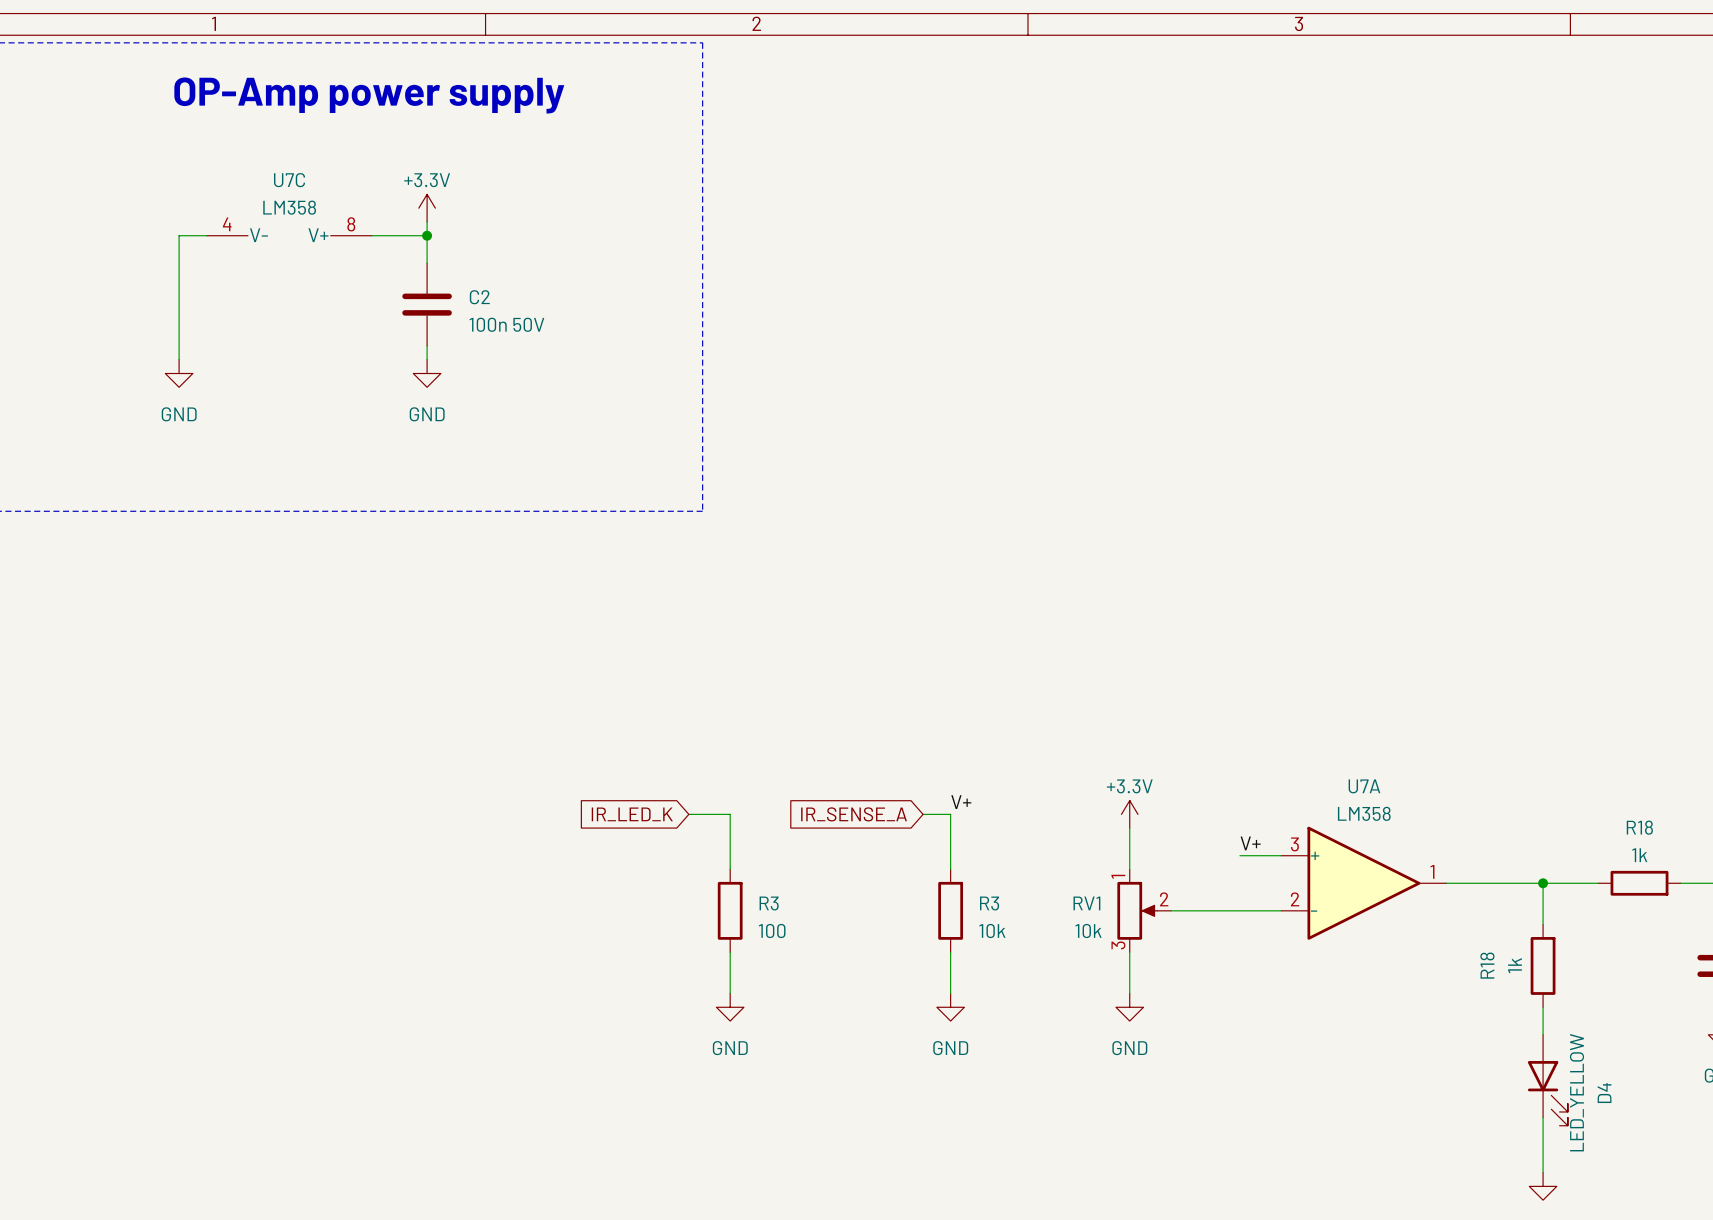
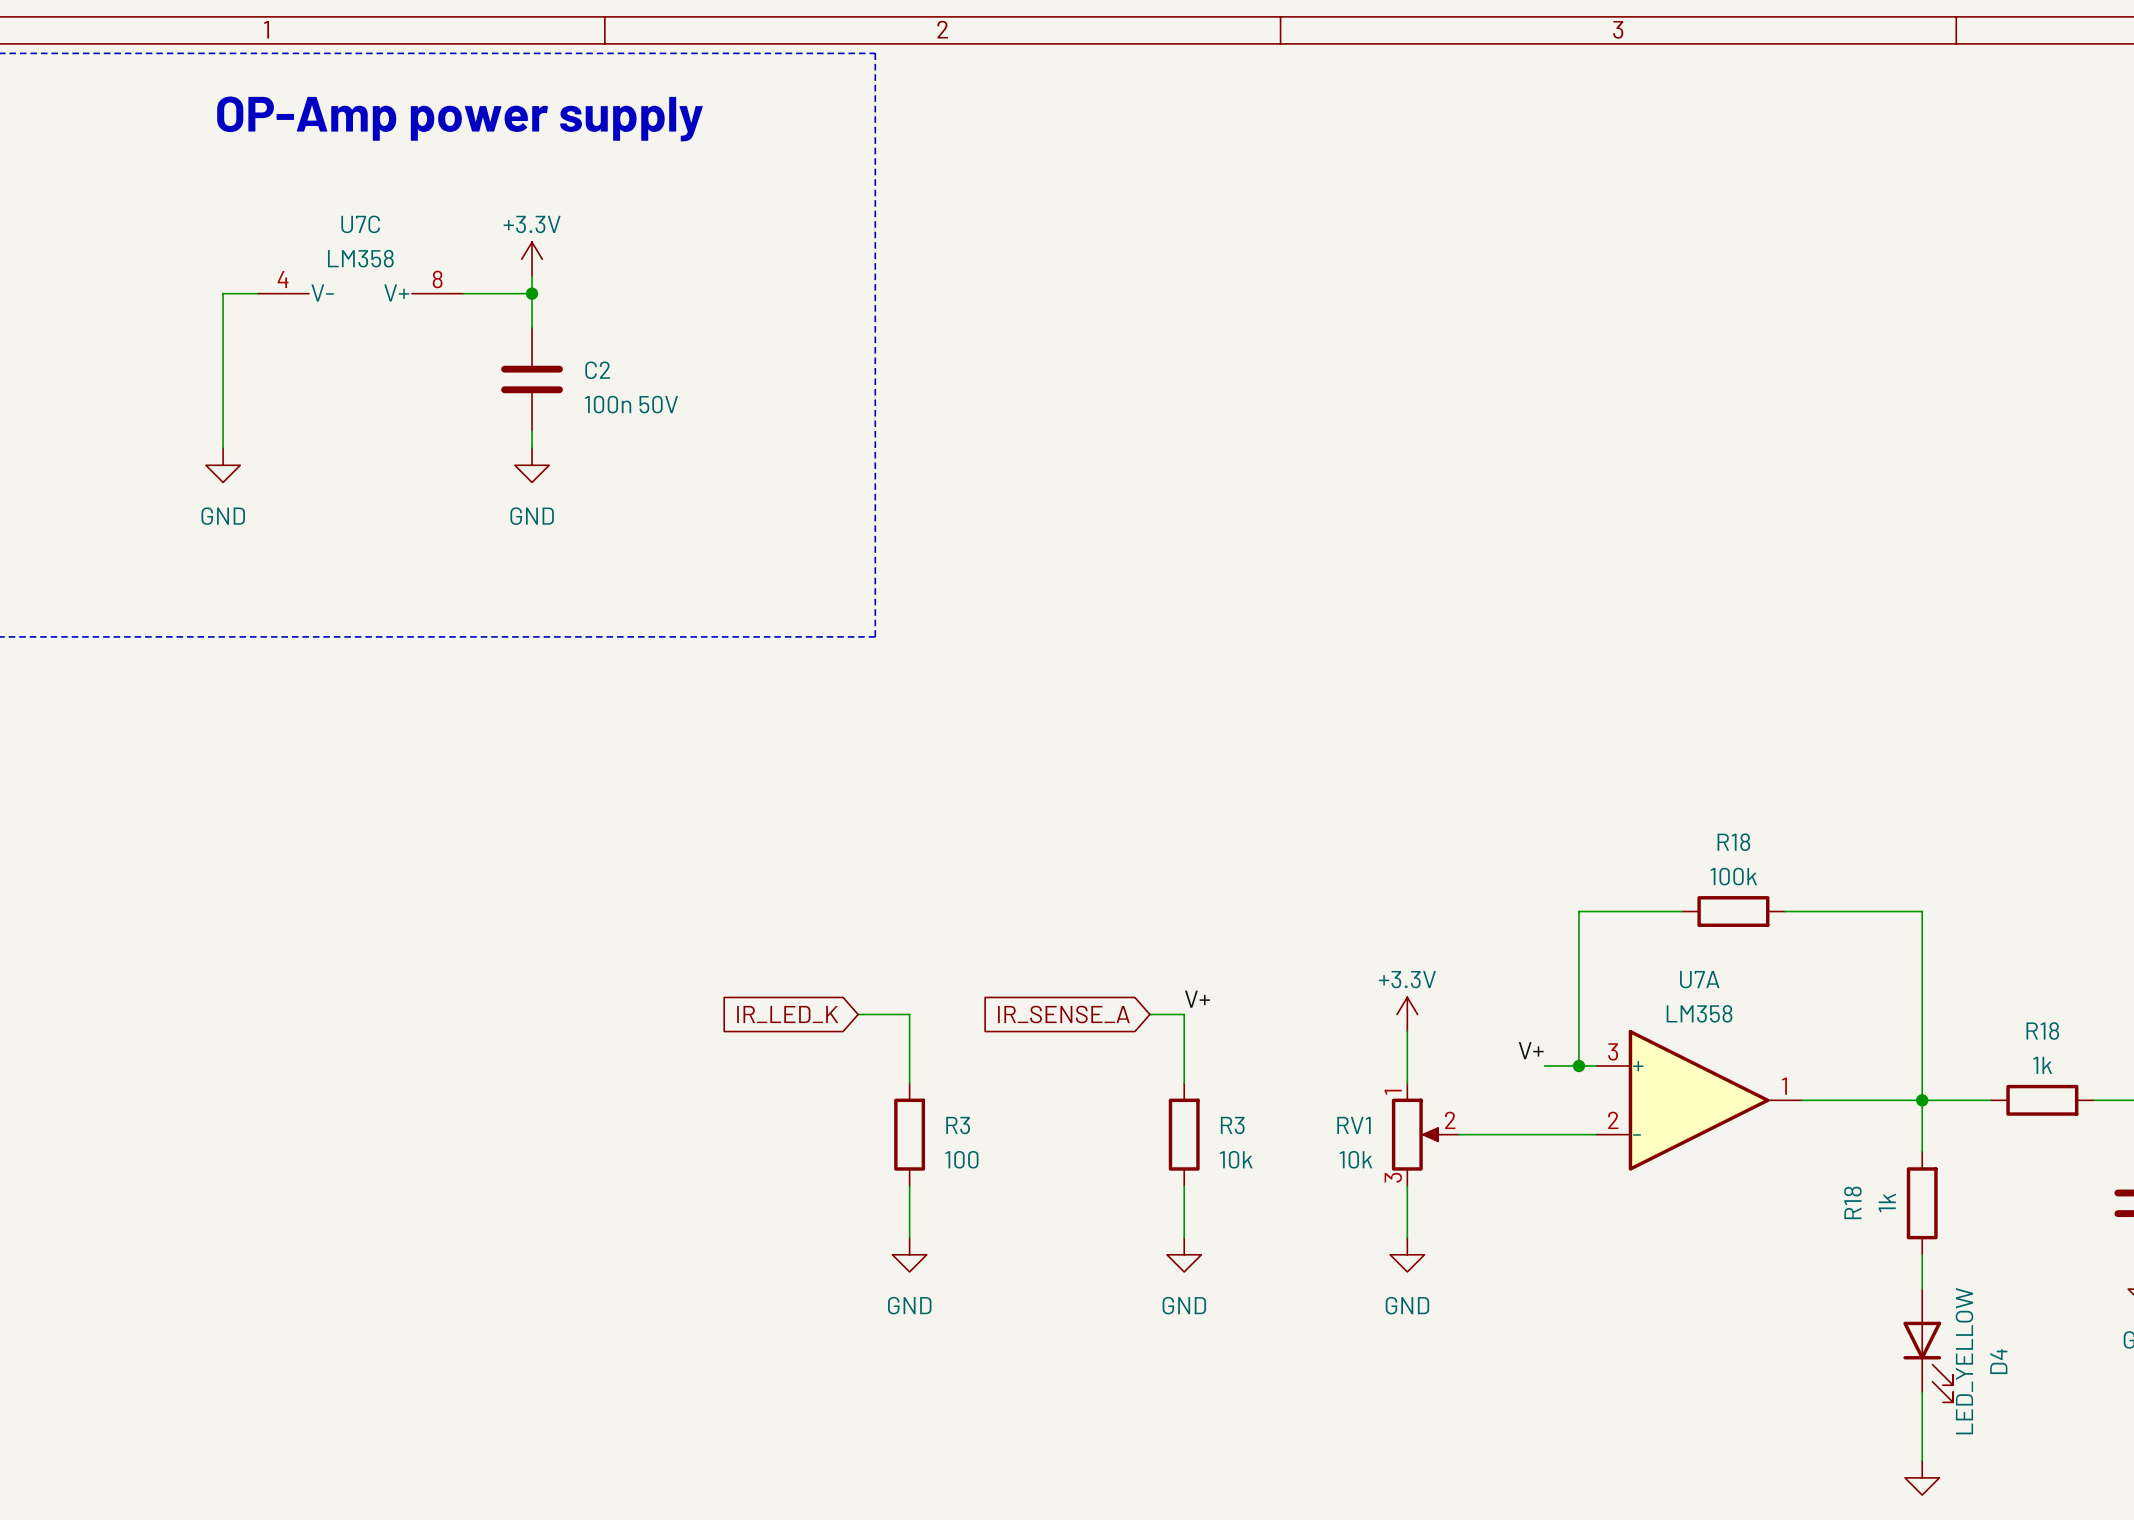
wire: none -> (1681, 911) (1578, 911) (1578, 1065)
R18: none -> 100k (1733, 911)
wire: none -> (1784, 911) (1922, 911) (1922, 1100)
label position: V+ (1250, 843) -> V+ (1531, 1050)
junction: none -> (1578, 1065)

